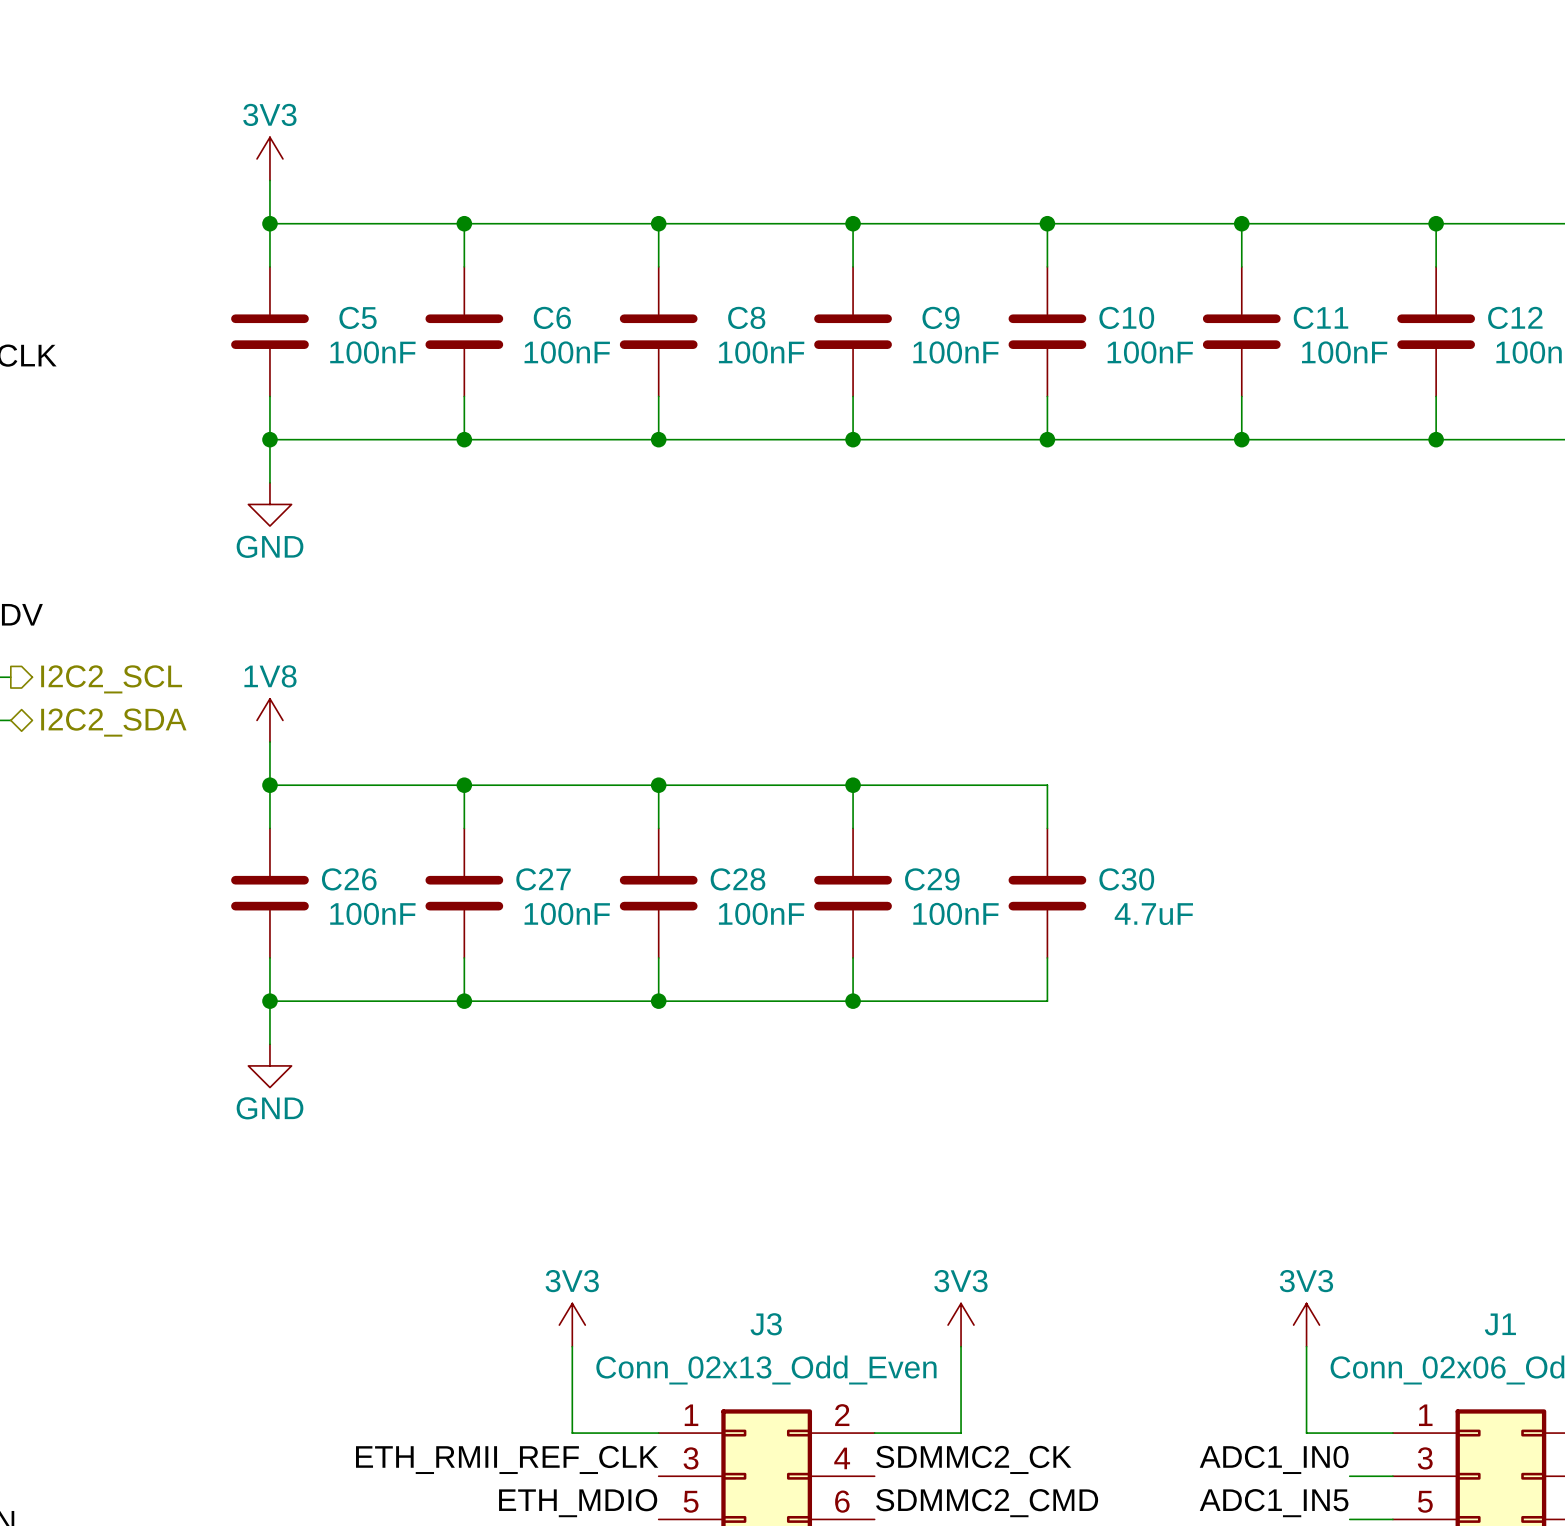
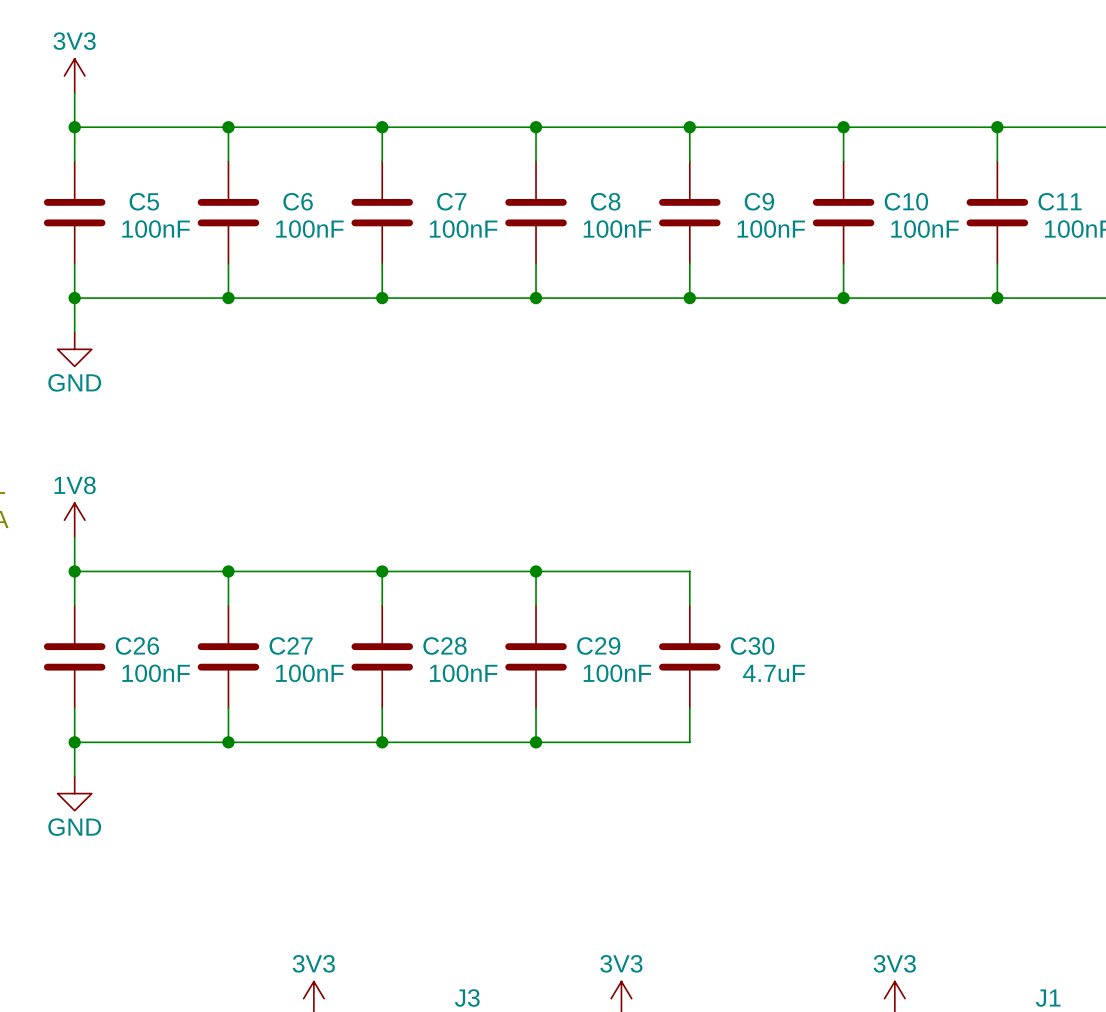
C8 name: C8 (746, 317) -> C7 (451, 201)
C9 name: C9 (941, 317) -> C8 (605, 201)
C10 name: C10 (1126, 317) -> C9 (759, 201)
C11 name: C11 (1320, 317) -> C10 (906, 201)
C12 name: C12 (1515, 317) -> C11 (1060, 201)

